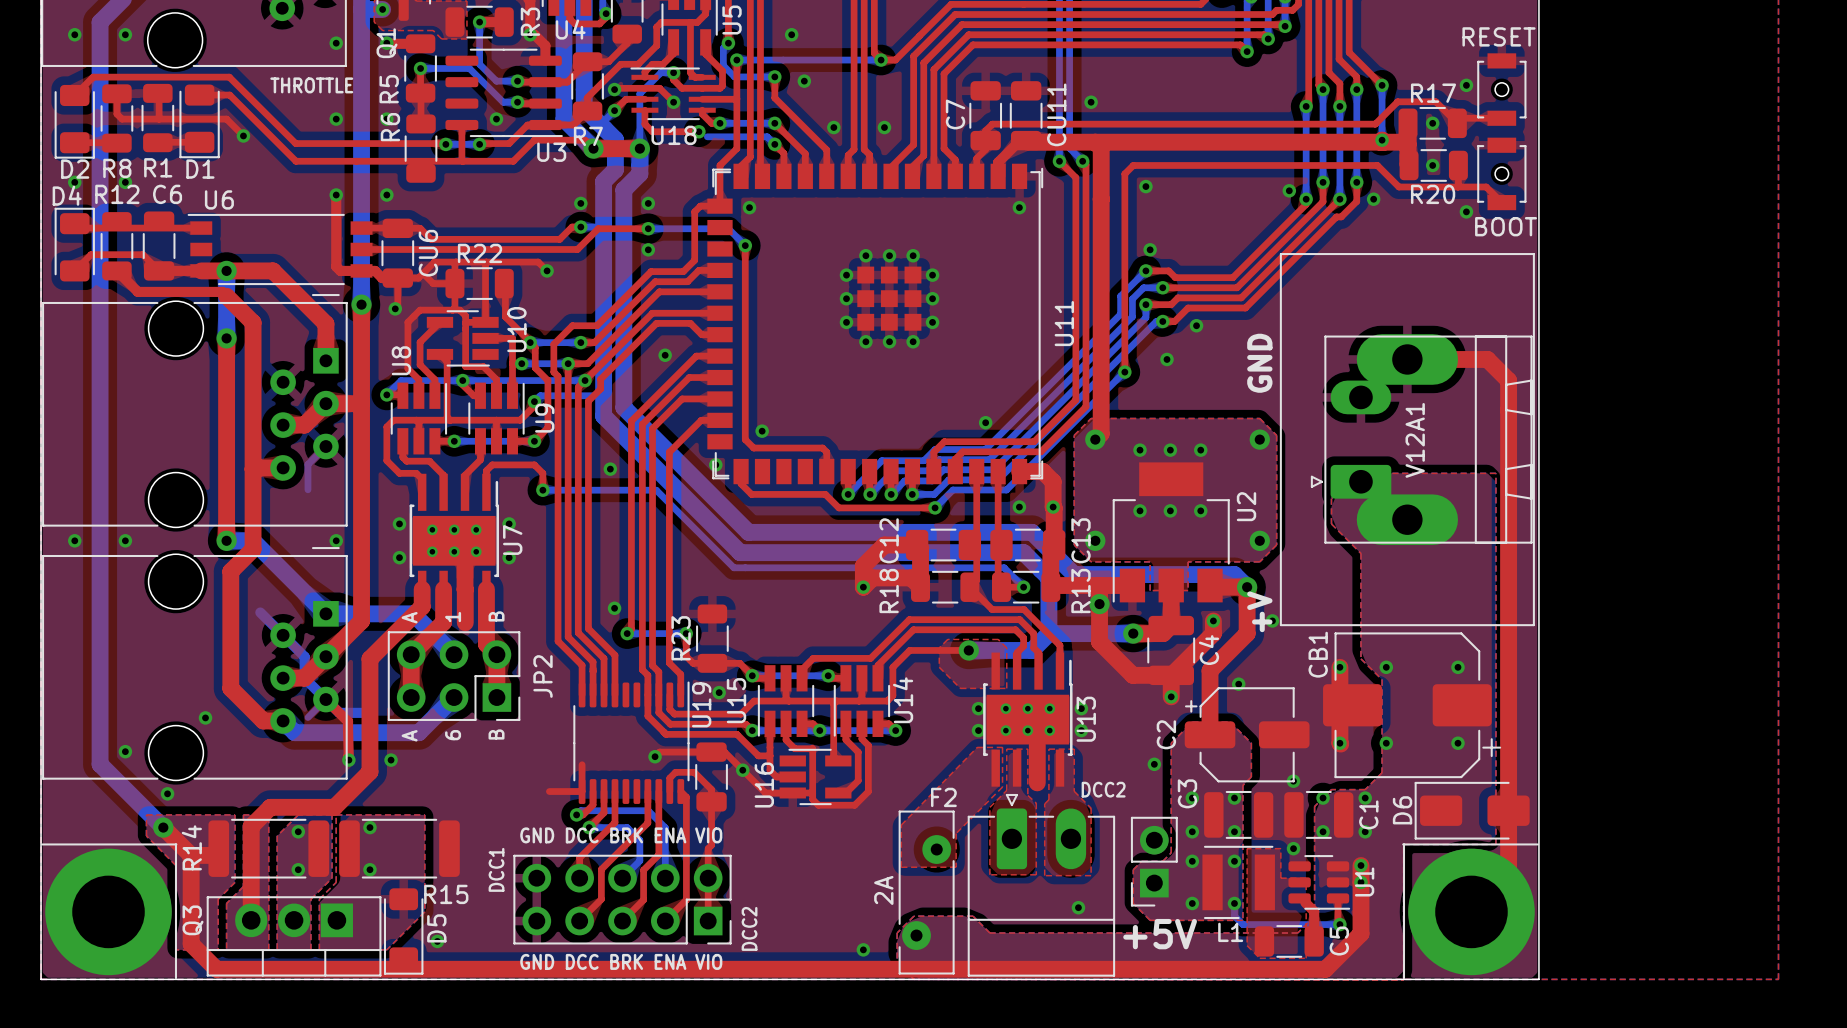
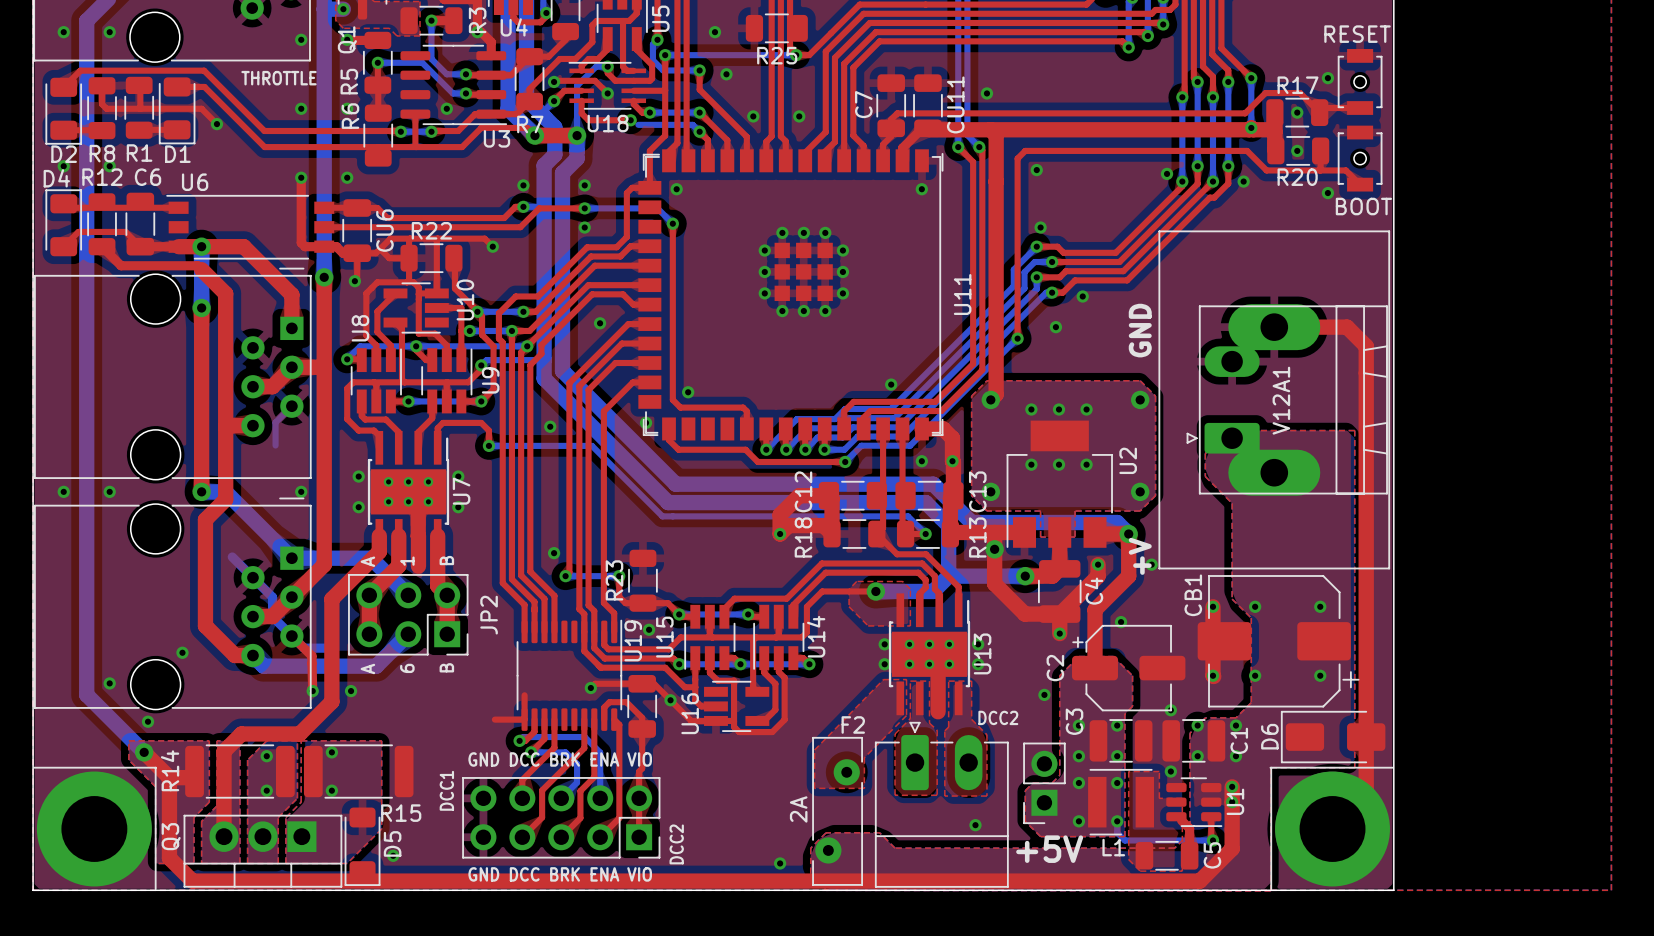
R25: none -> (776, 28)
bottom track: (325, 699) (307, 717) -> none

